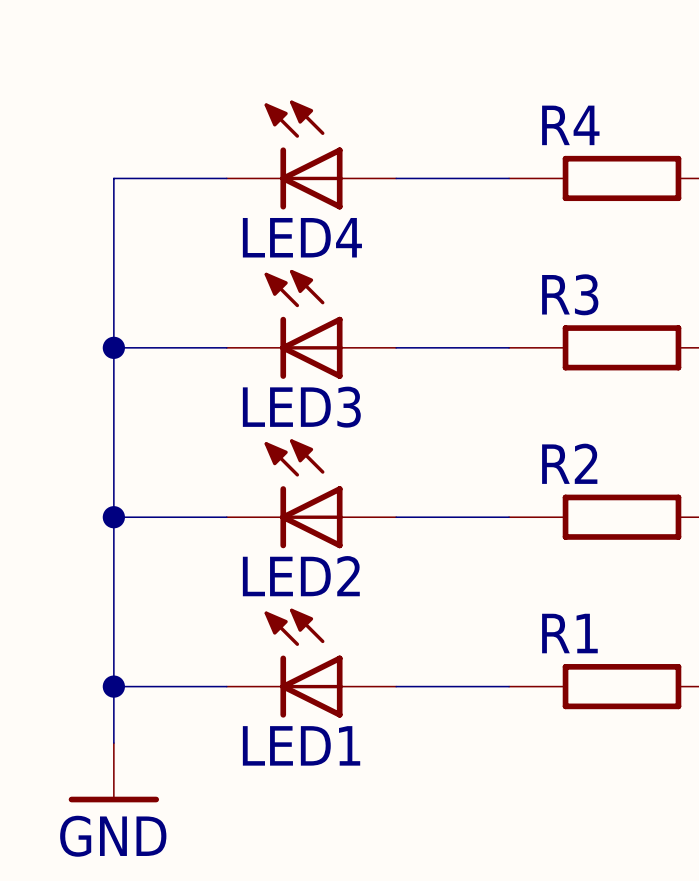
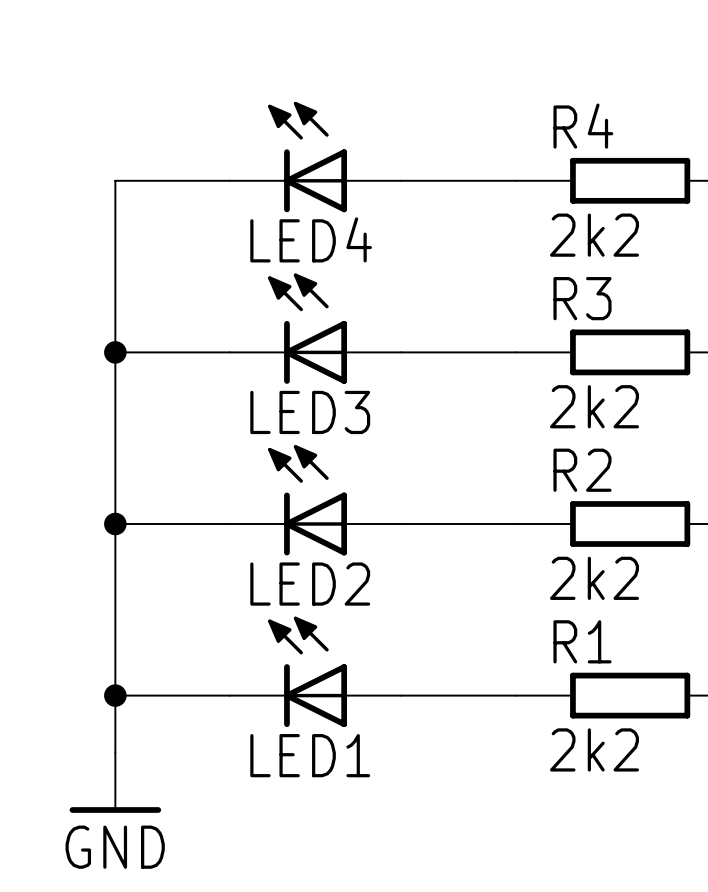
R4 value: none -> 2k2 (594, 235)
R3 value: none -> 2k2 (594, 406)
R2 value: none -> 2k2 (594, 578)
R1 value: none -> 2k2 (594, 749)

